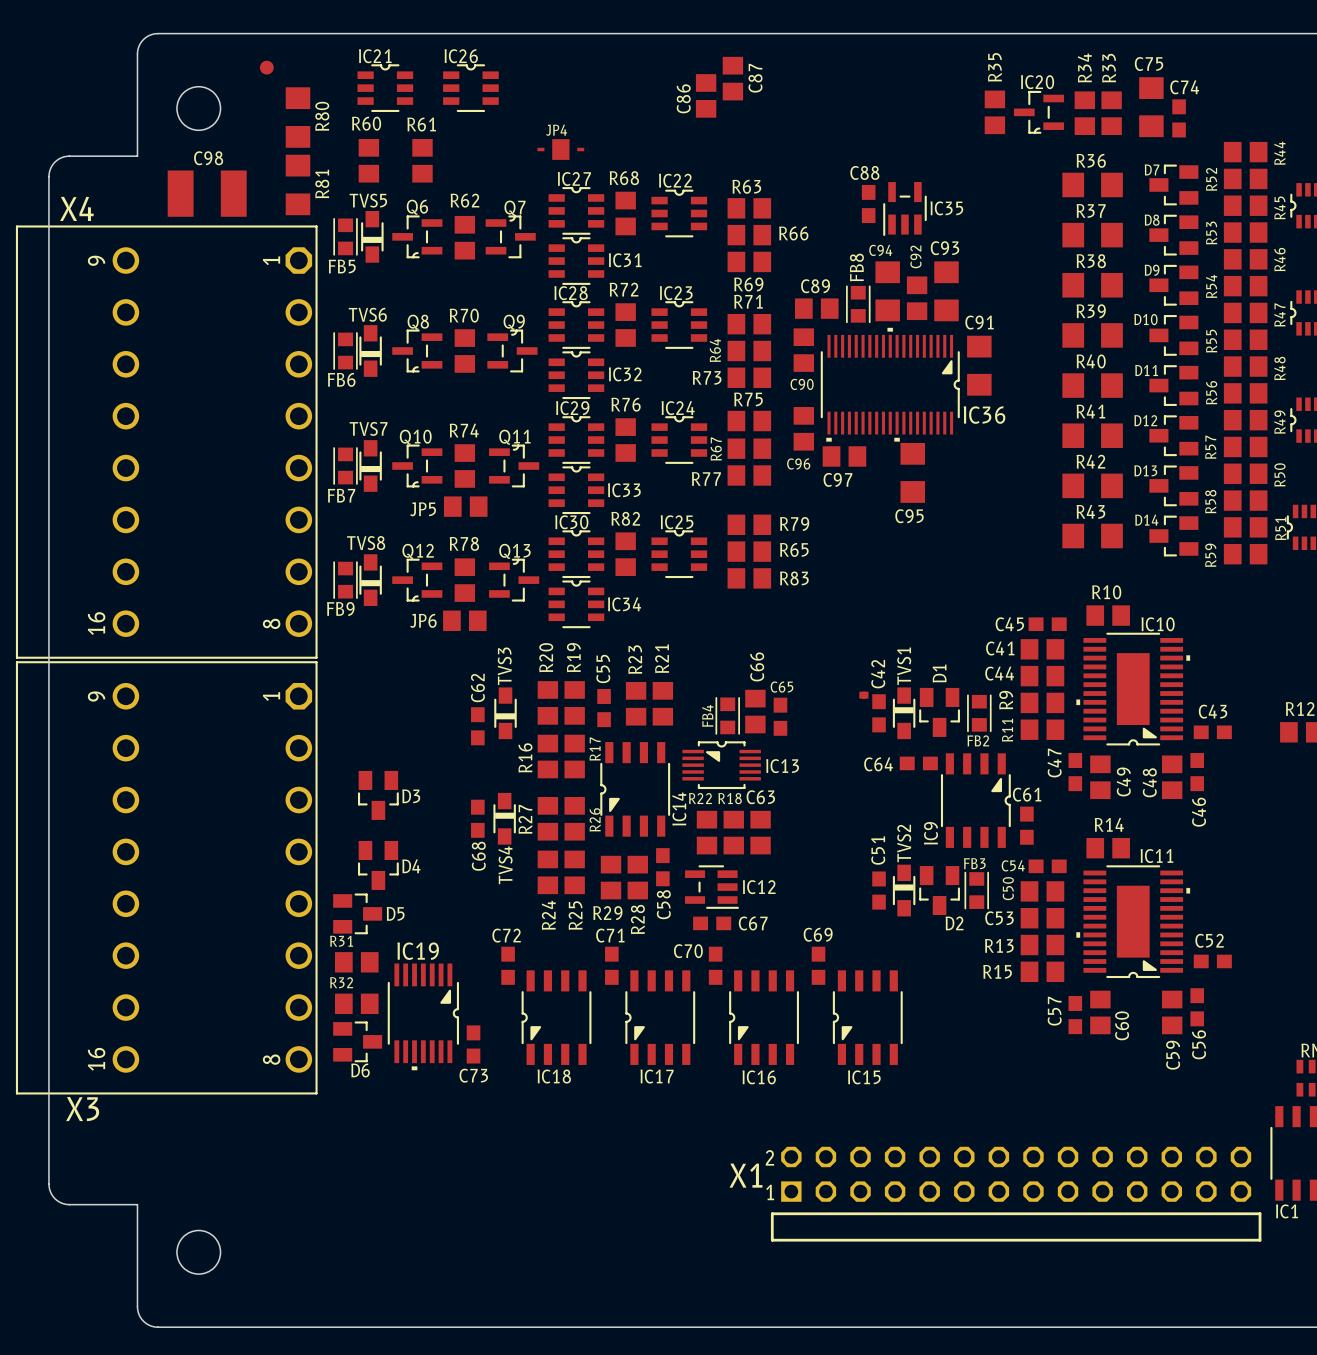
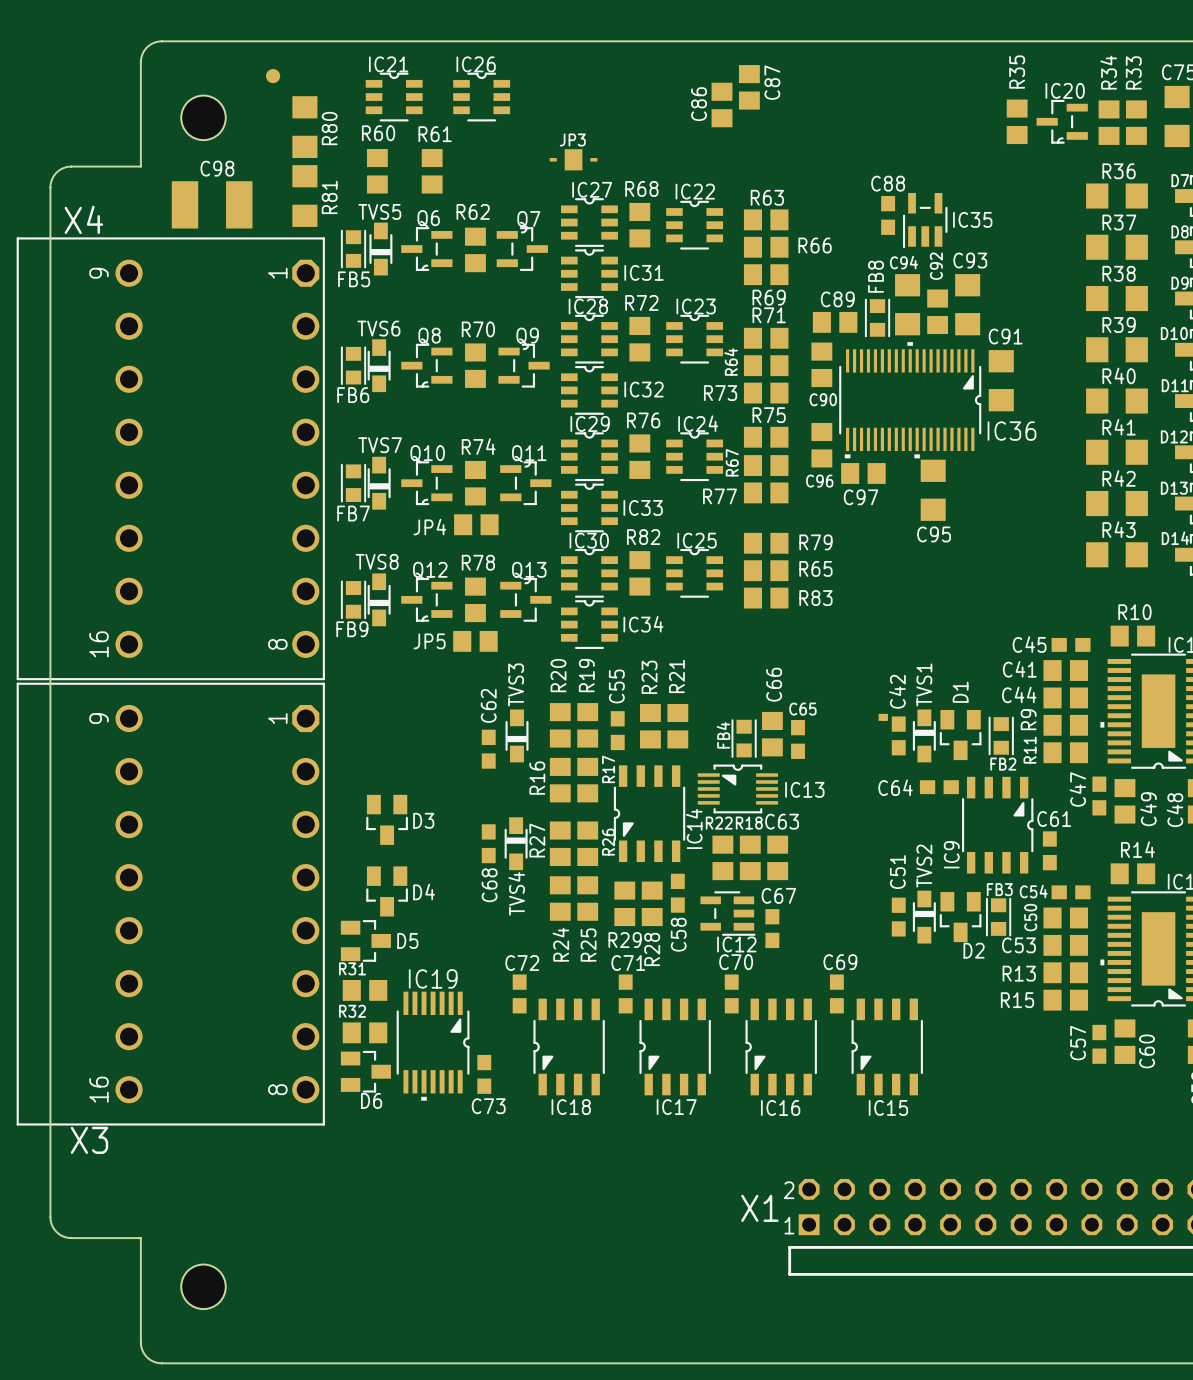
JP4 name: JP4 (556, 130) -> JP3 (572, 139)
JP5 name: JP5 (423, 509) -> JP4 (429, 527)
JP6 name: JP6 (423, 620) -> JP5 (429, 641)
IC12 name position: IC12 (759, 887) -> IC12 (736, 944)
C67 rotation: 0° (712, 923) -> 90° clockwise (772, 928)
C67 position: (712, 923) -> (772, 928)
C67 name position: C67 (753, 923) -> C67 (778, 895)
C70 name position: C70 (688, 951) -> C70 (736, 962)

